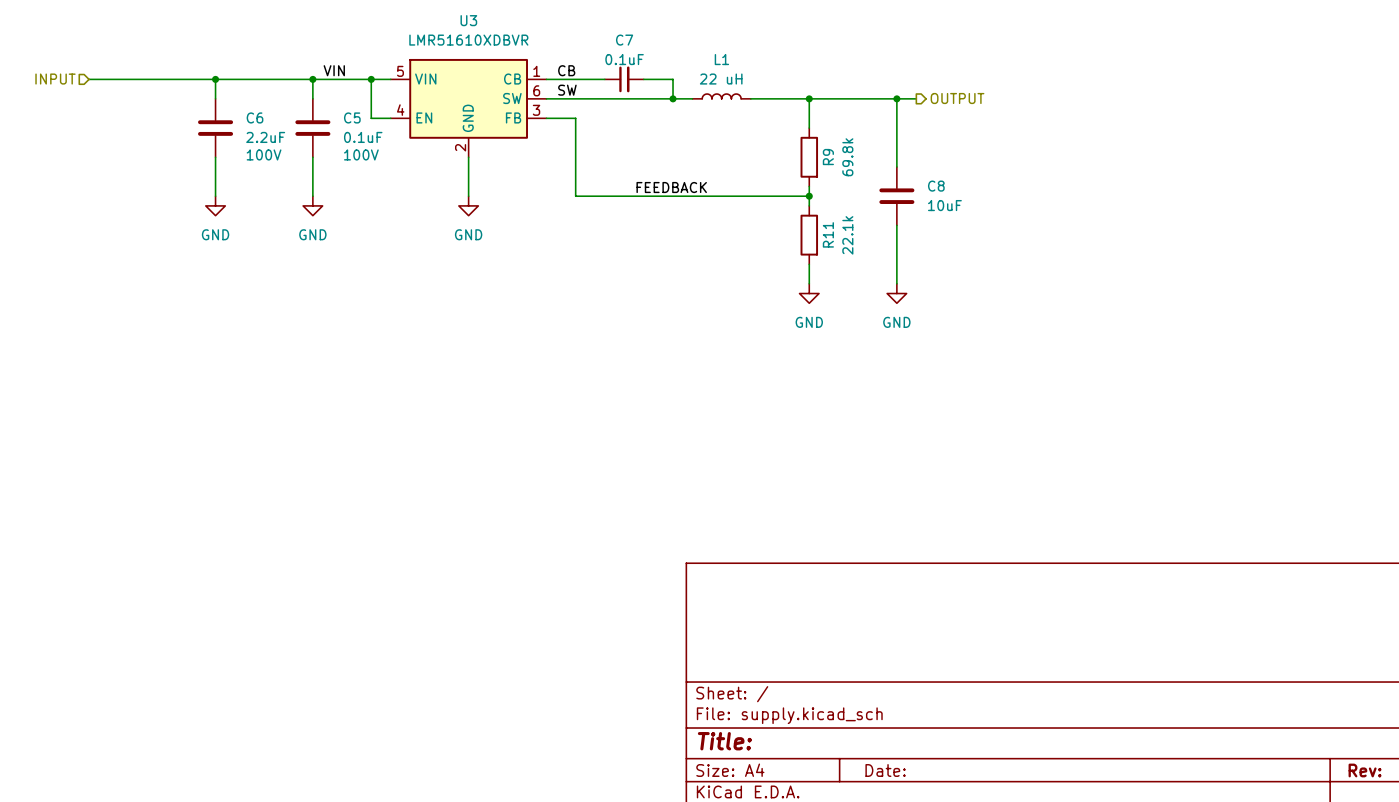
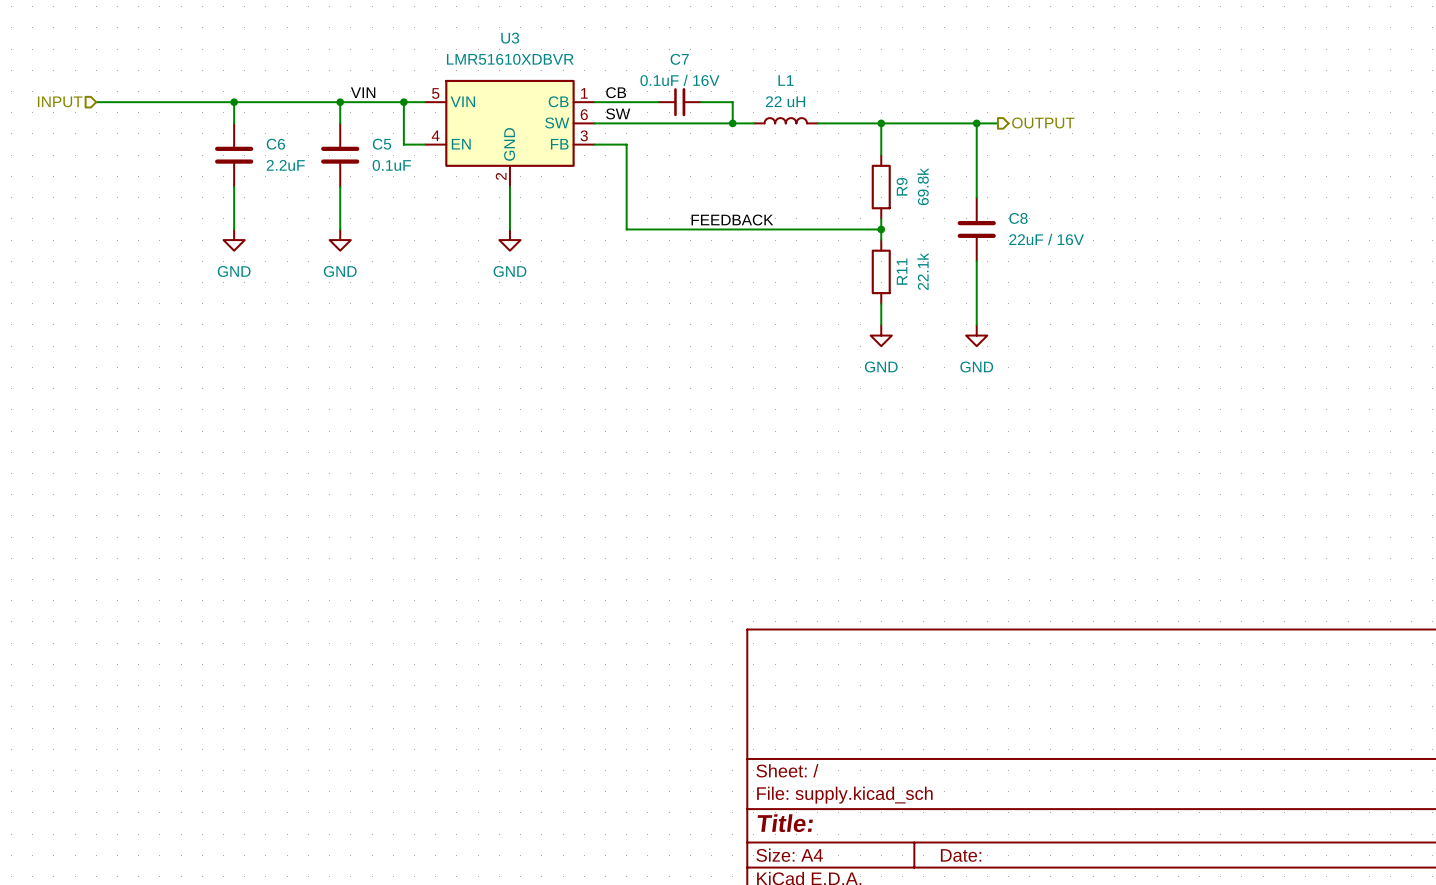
C7 value: 0.1uF (624, 59) -> 0.1uF / 16V (679, 80)
C6 text: 100V (264, 154) -> none
C5 text: 100V (361, 154) -> none
C8 value: 10uF (944, 205) -> 22uF / 16V (1046, 239)

